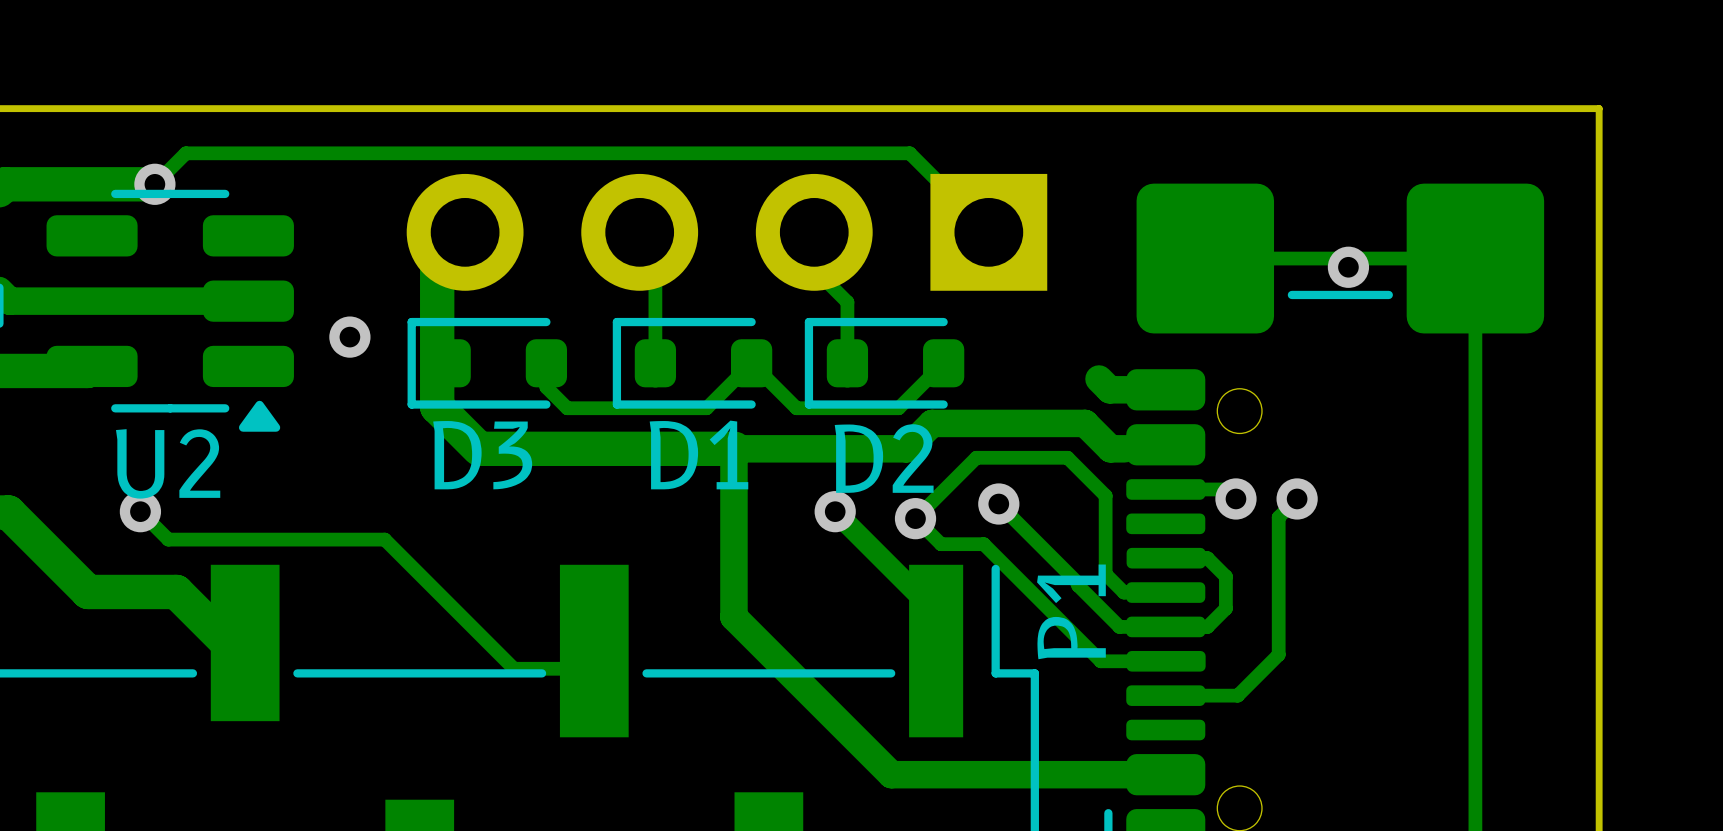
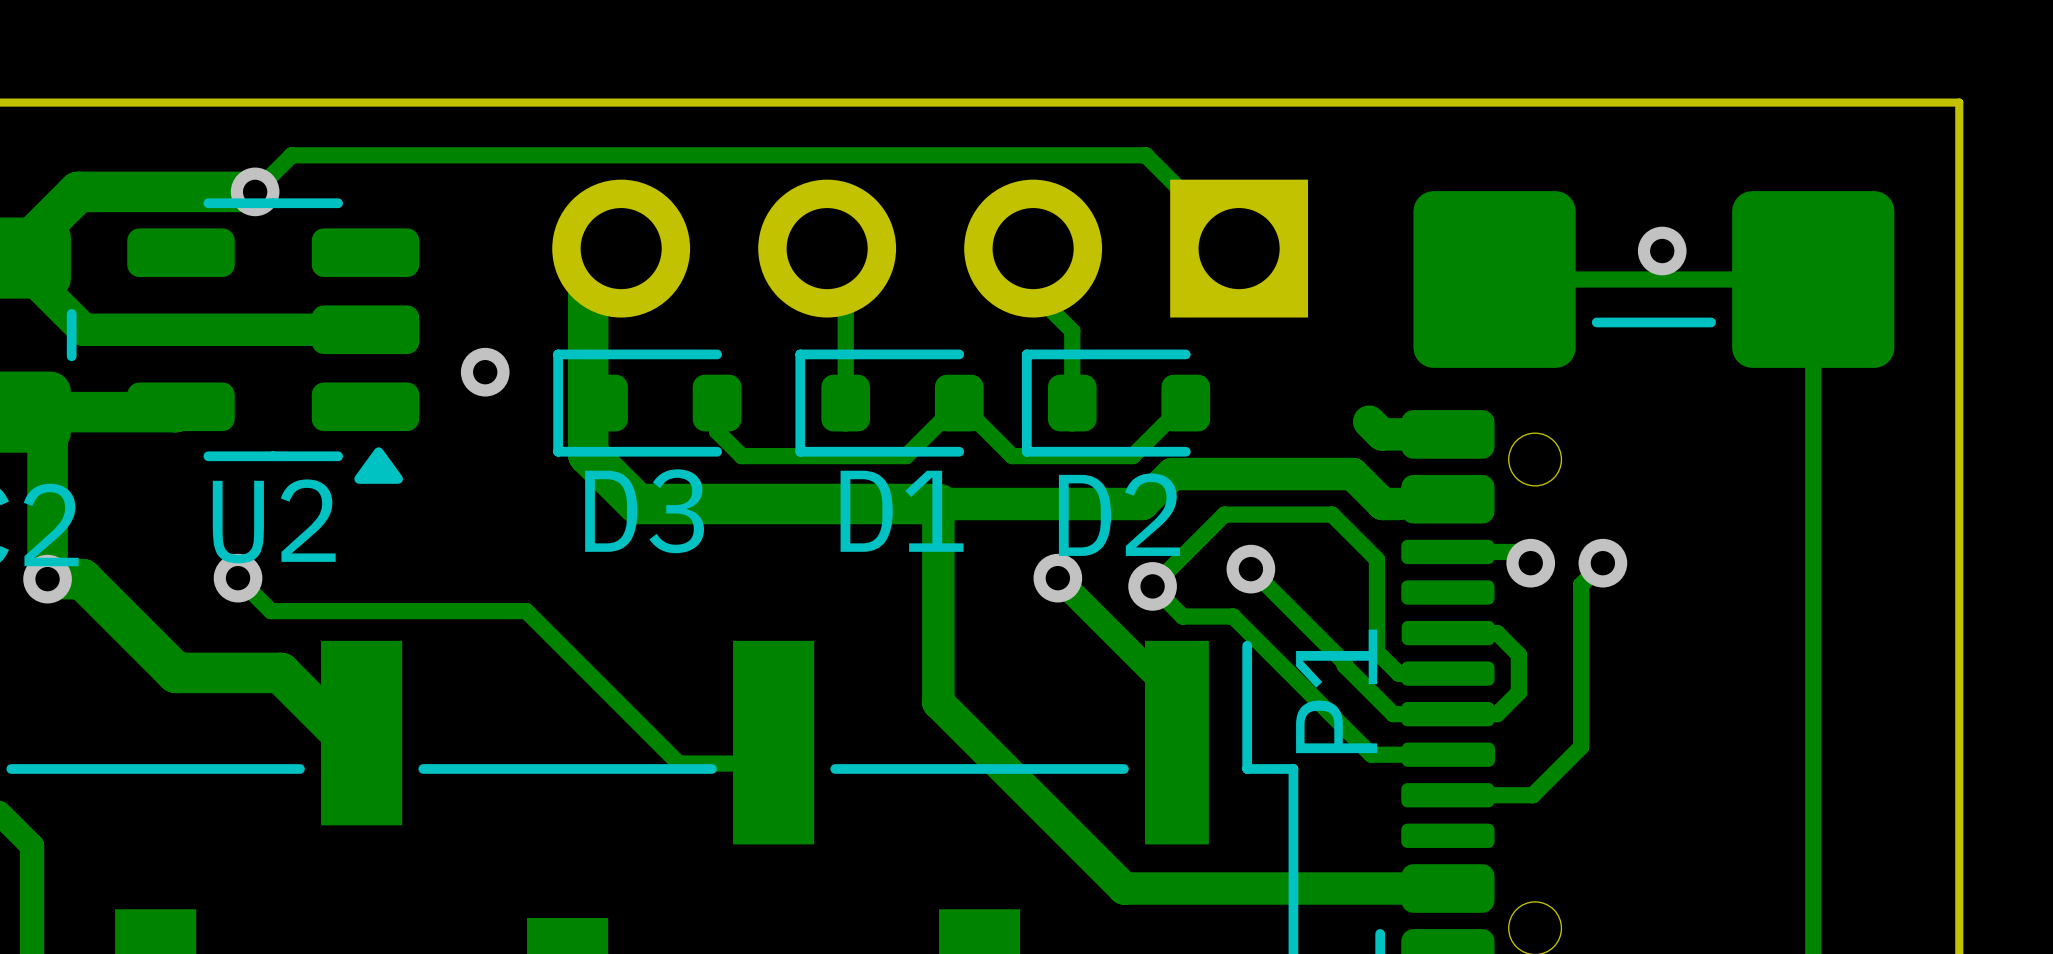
via position: (1348, 267) -> (1662, 251)

